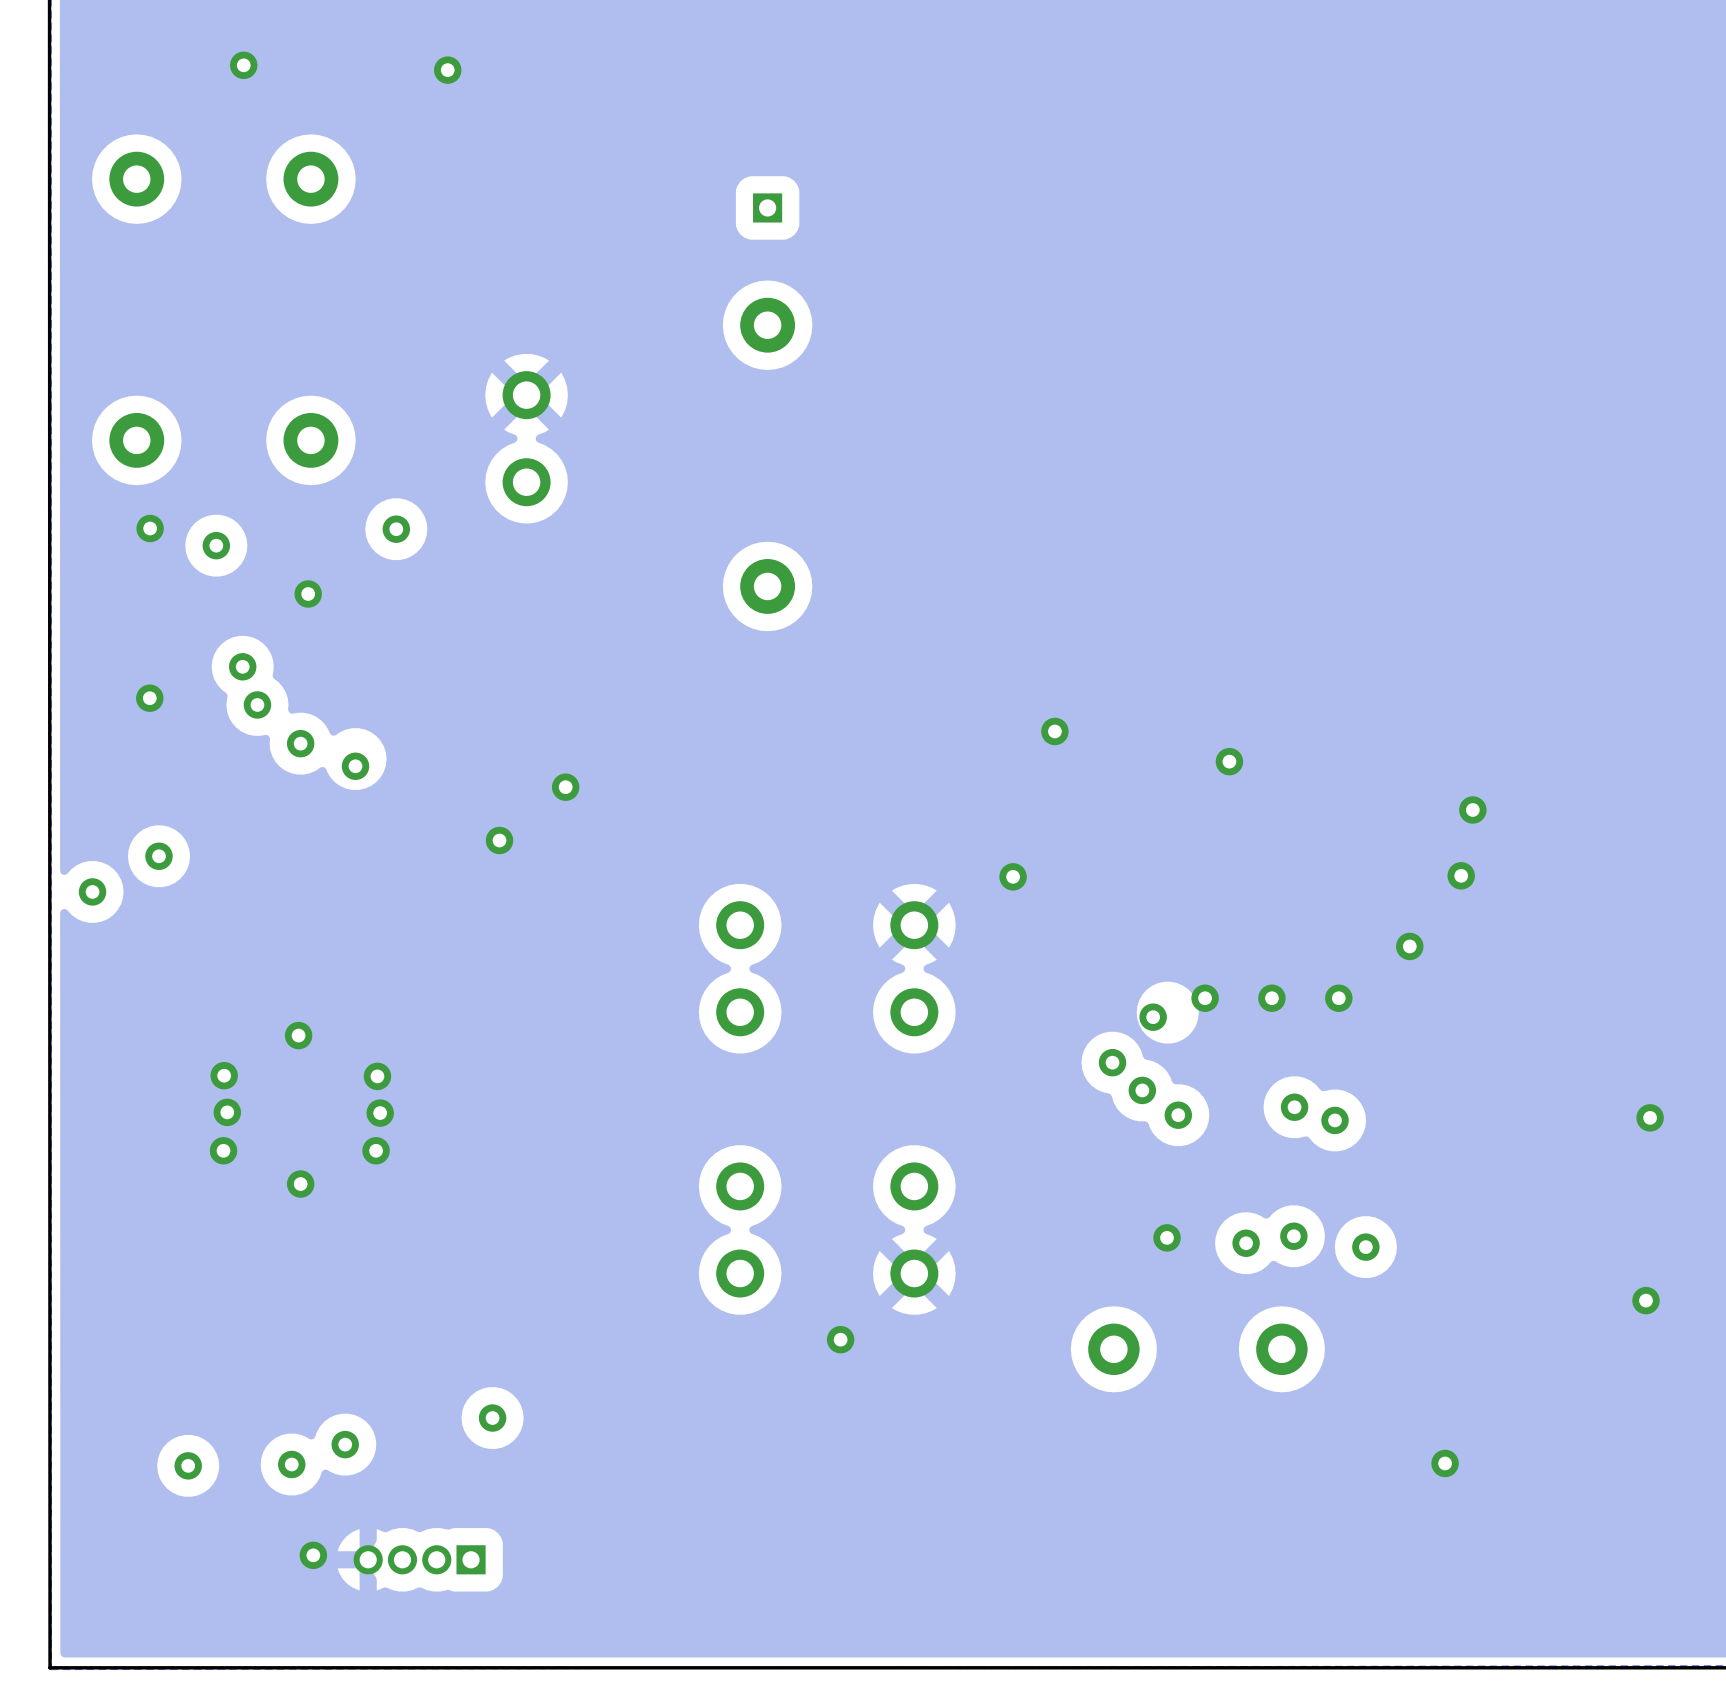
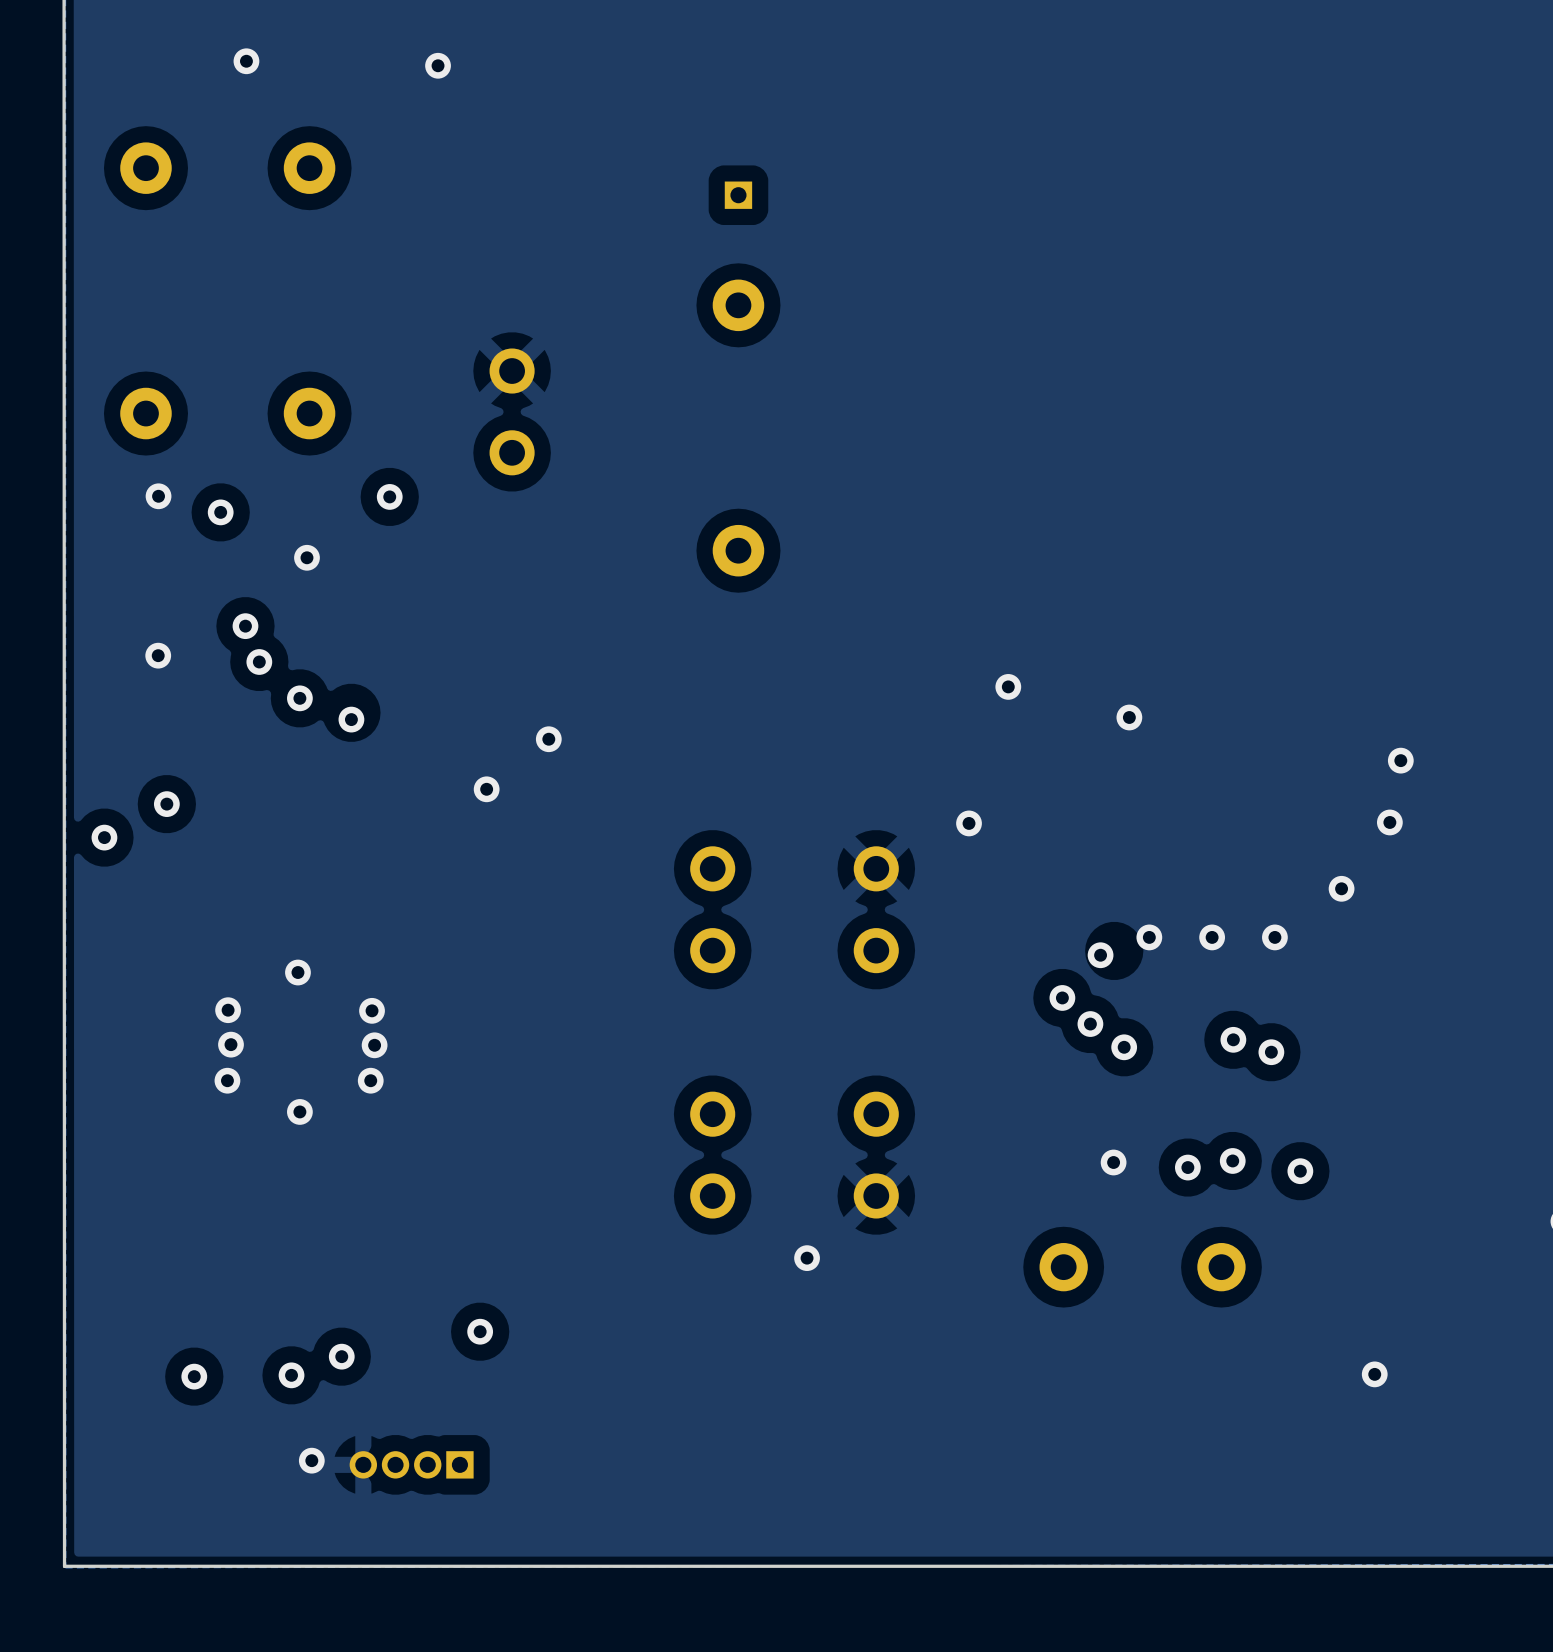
via position: (1229, 761) -> (1129, 717)

